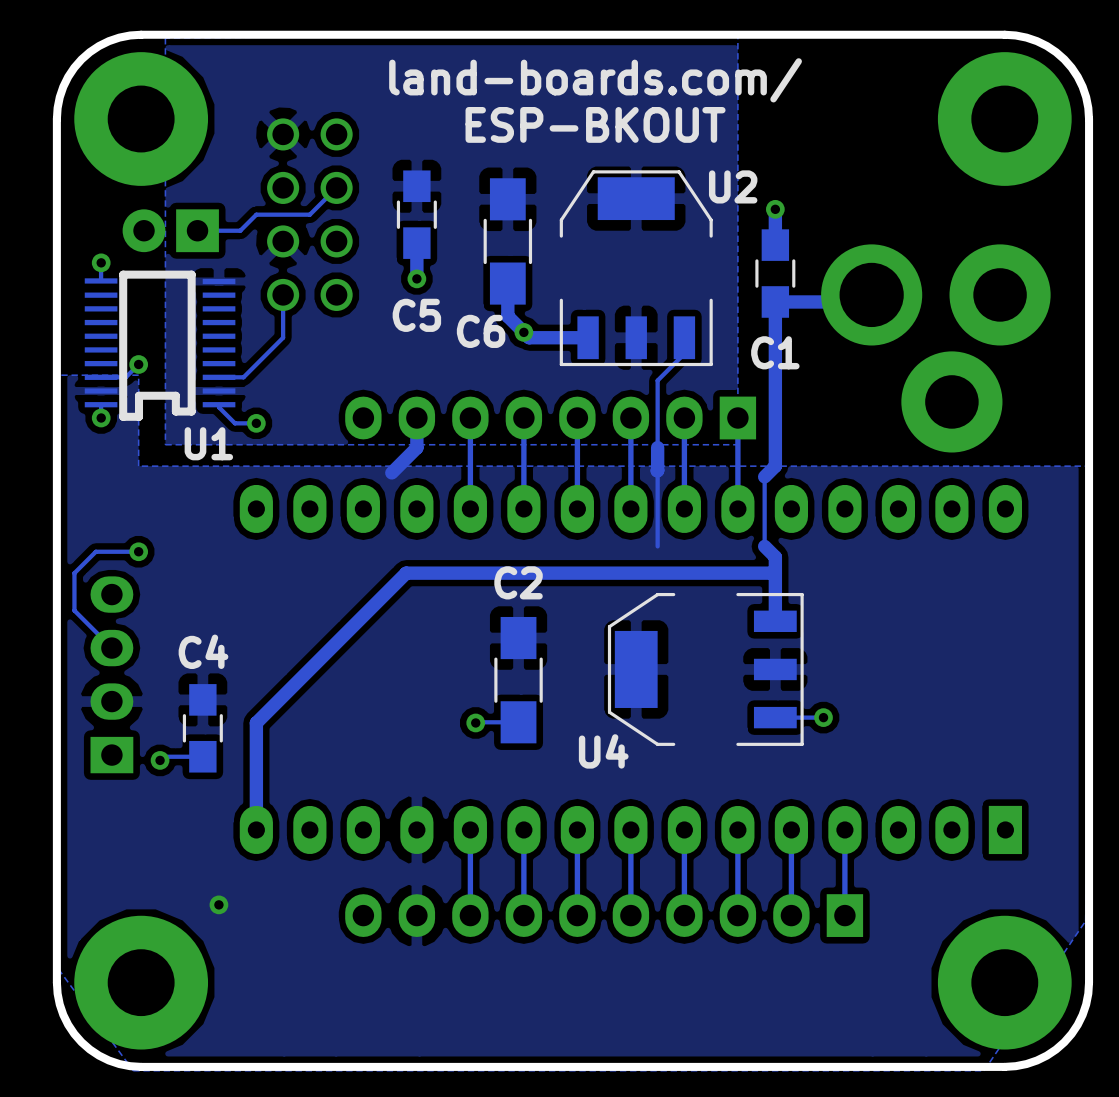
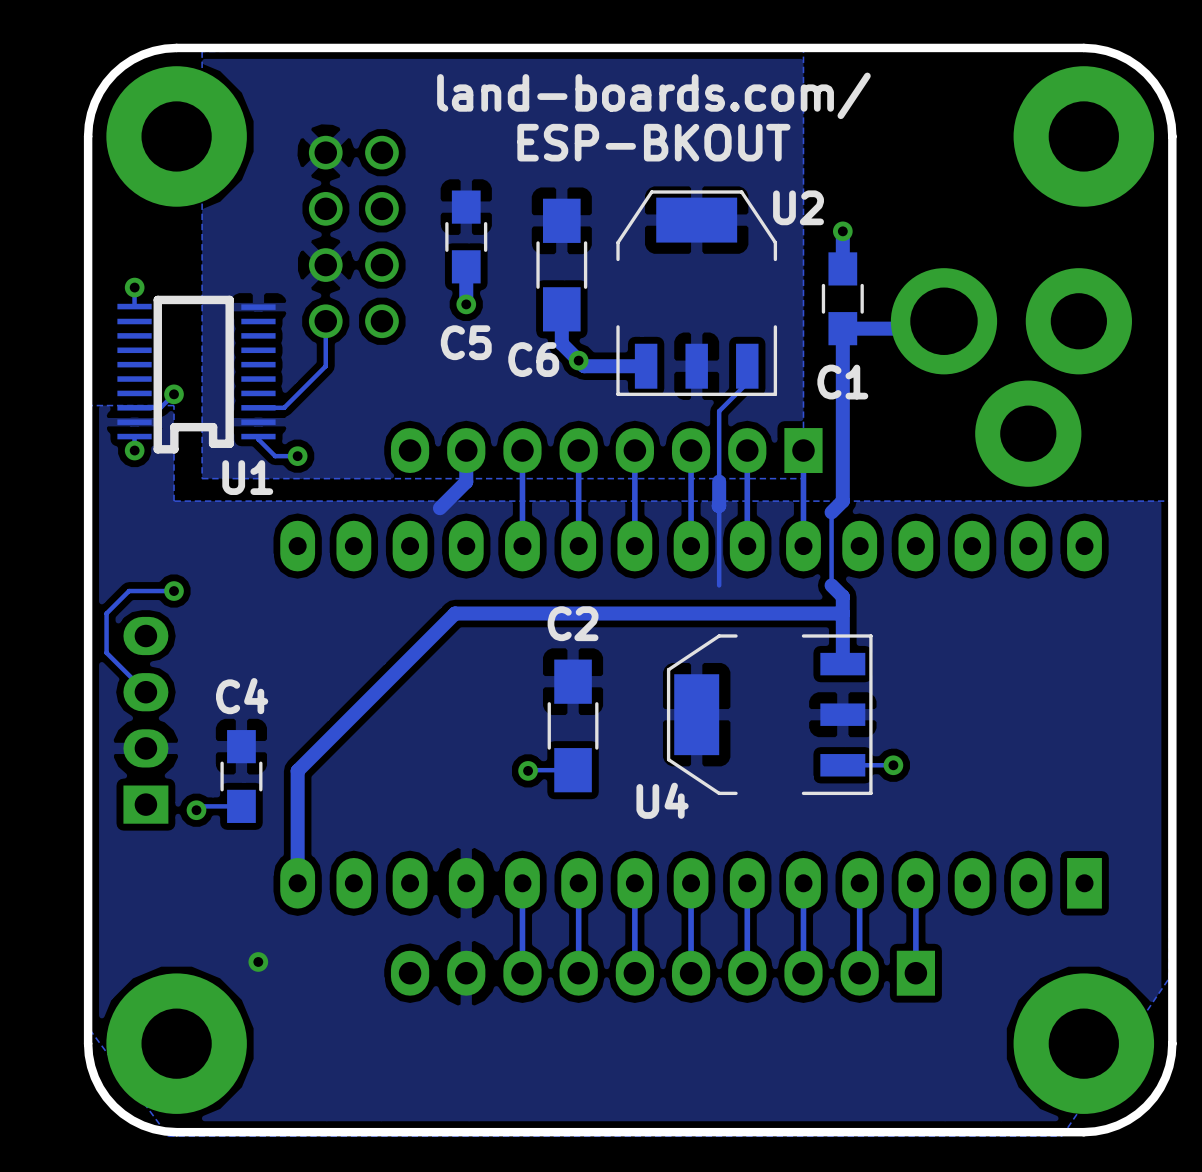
track: (336, 187) (309, 214) (256, 214) (240, 230) (197, 230) -> none
part: (170, 230) -> none

